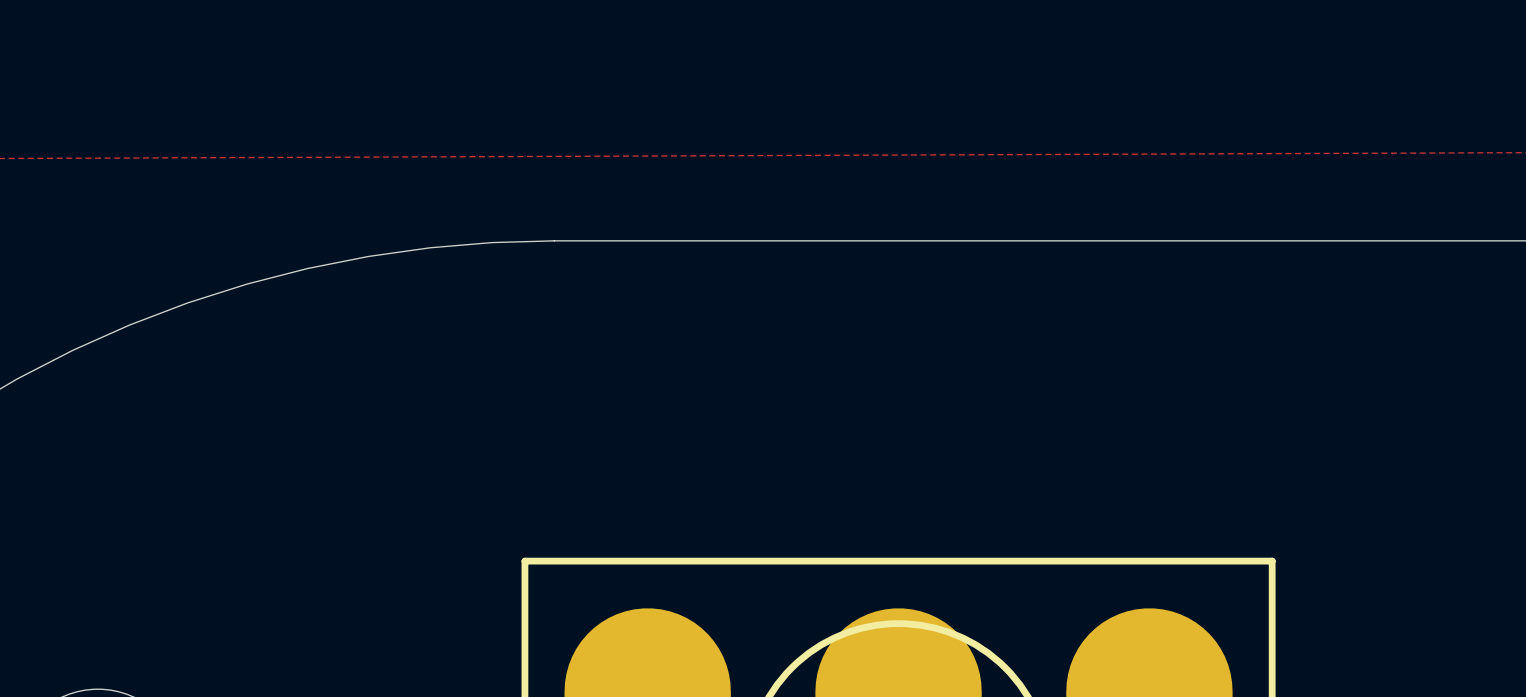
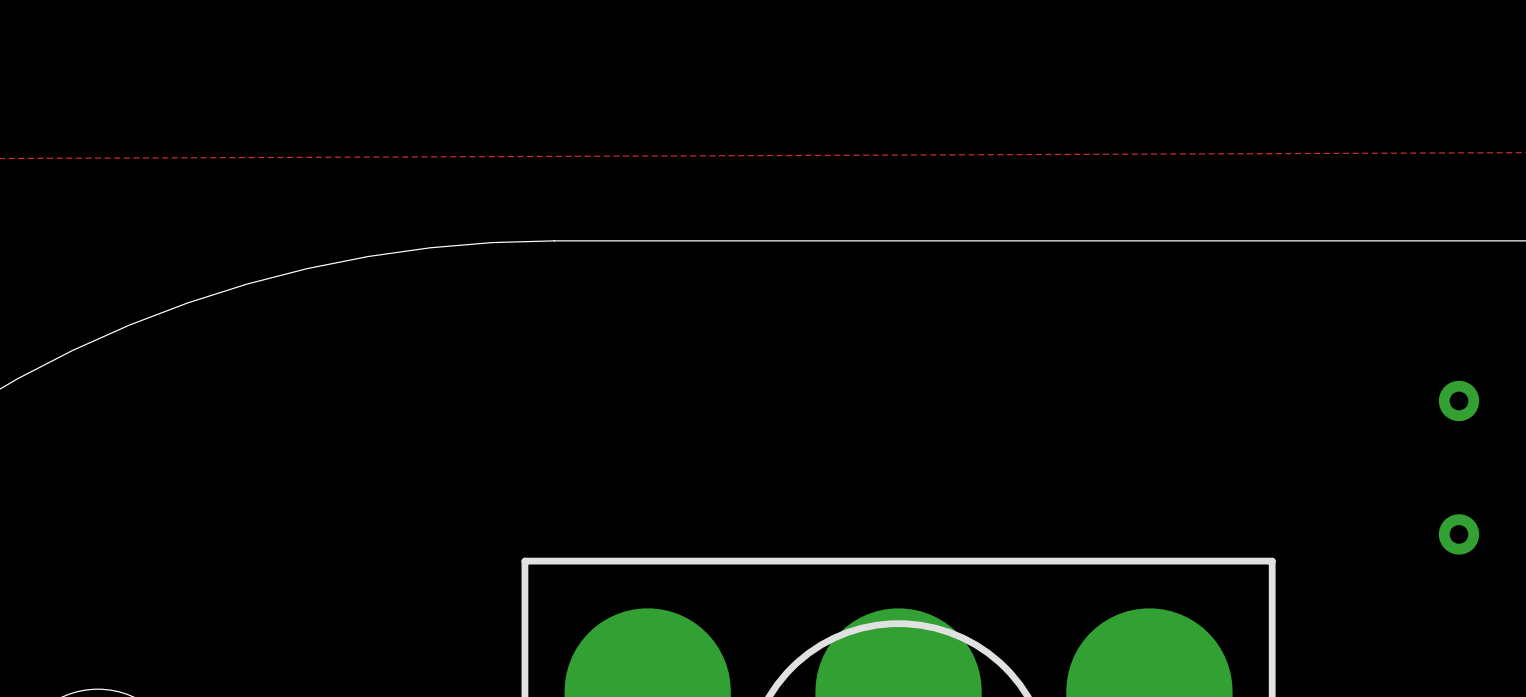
via: none -> (1459, 400)
via: none -> (1459, 534)

